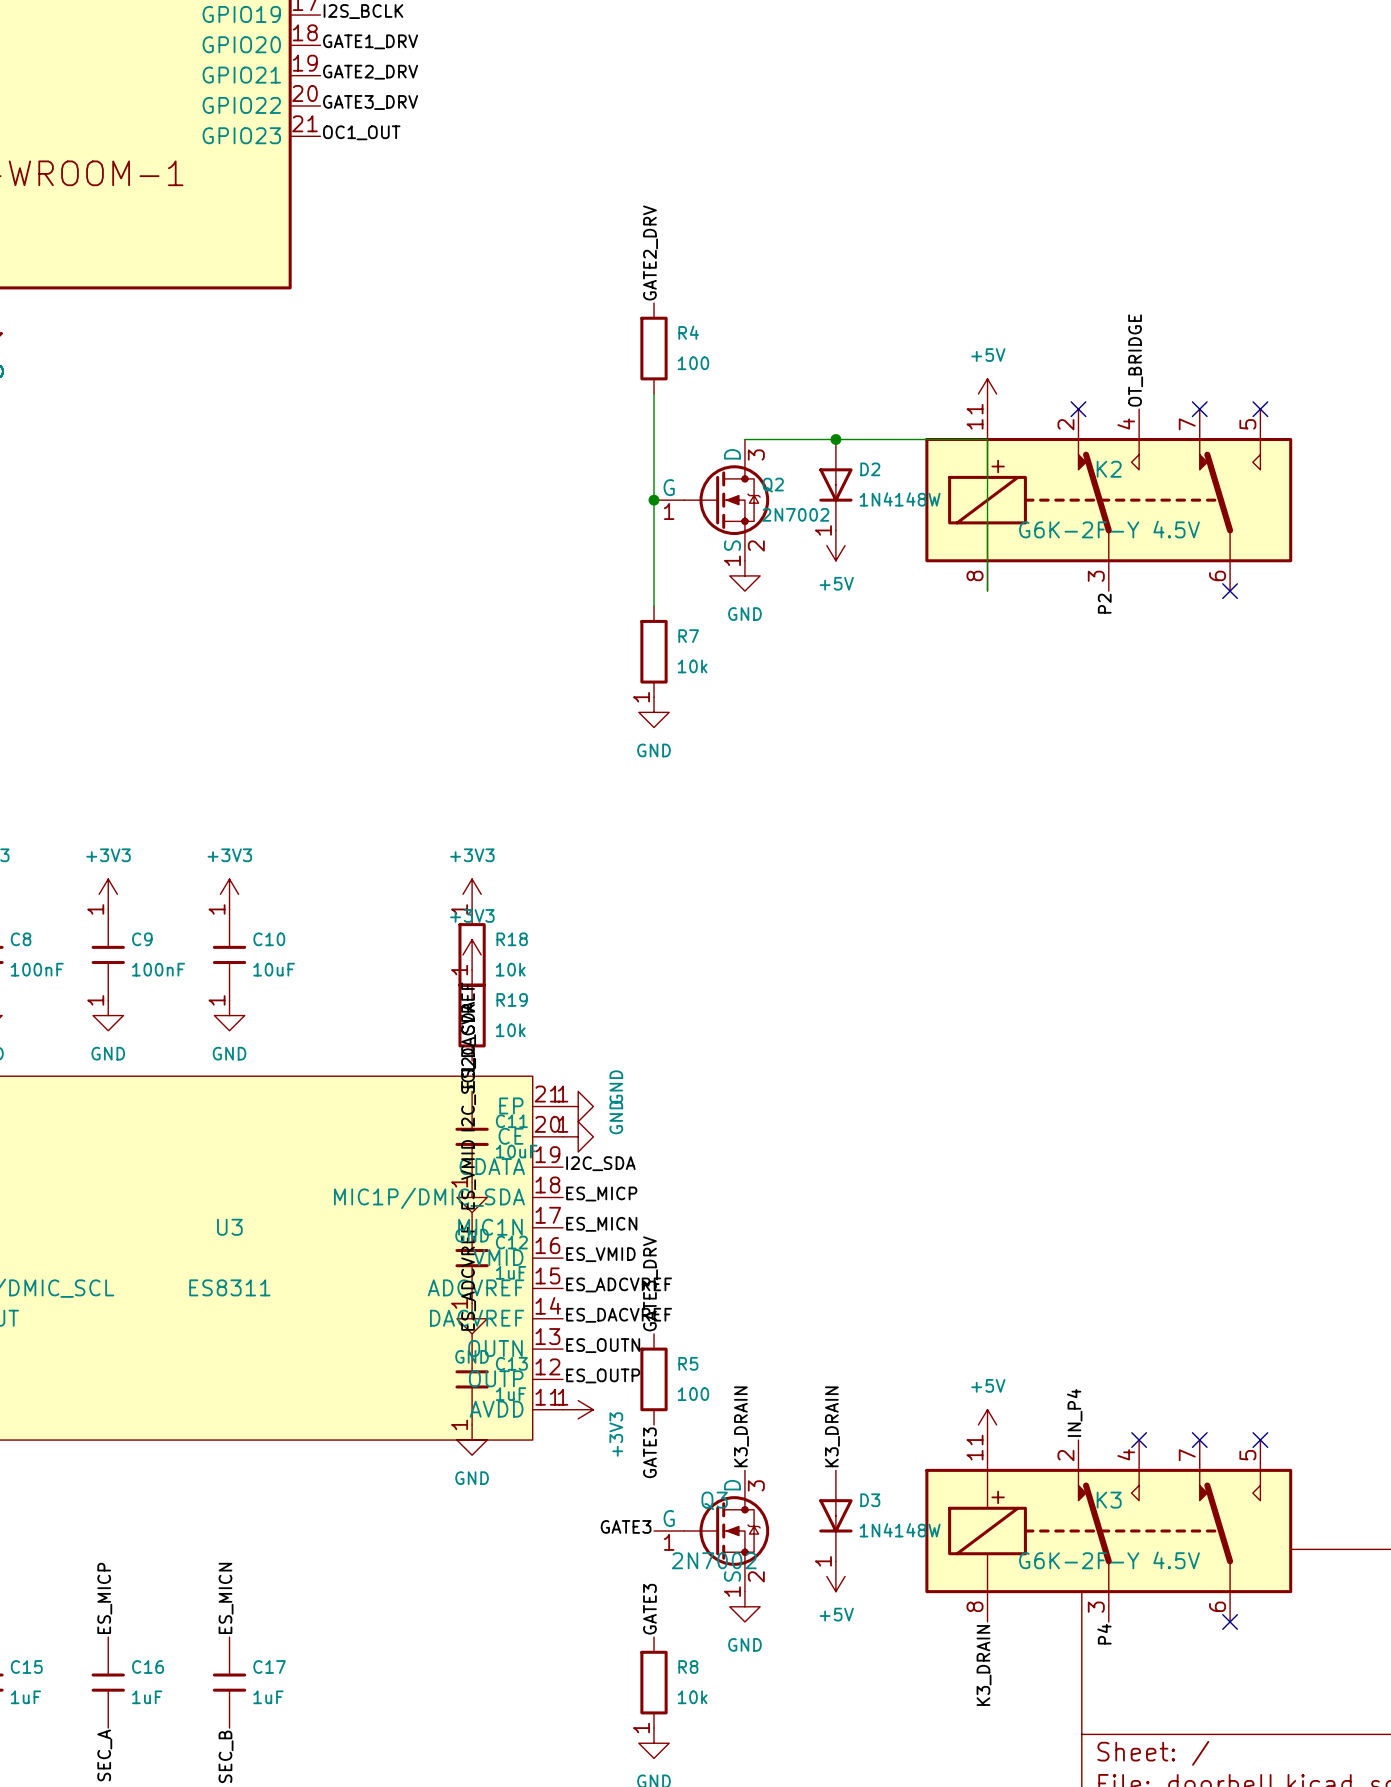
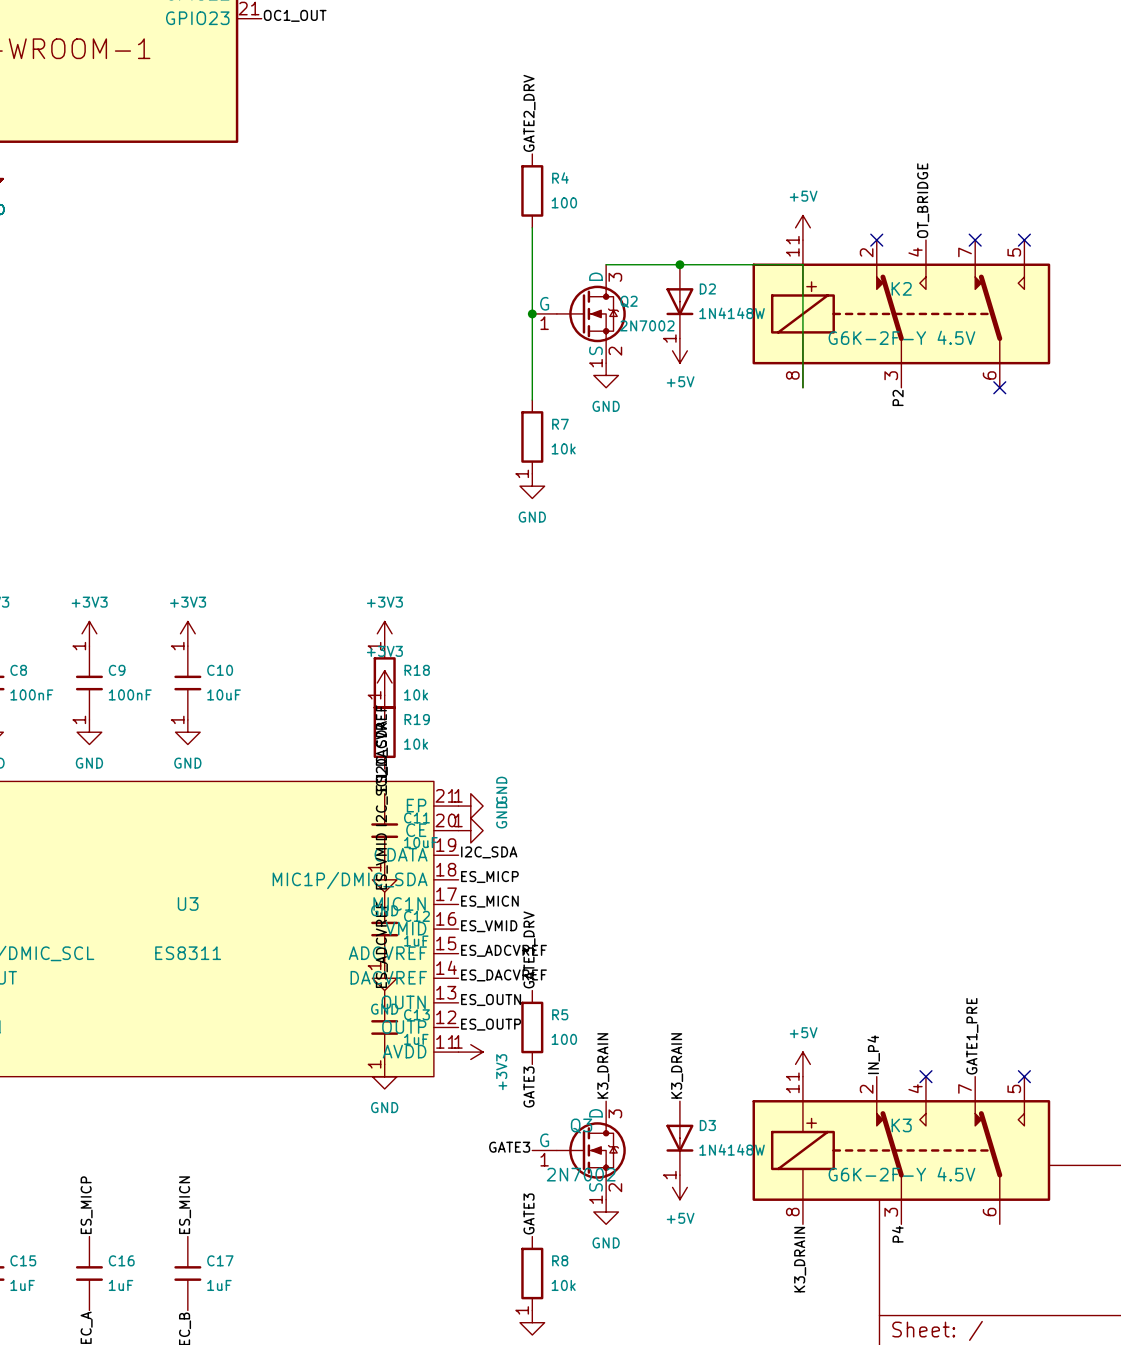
label: none -> GATE1_PRE (972, 1036)
no-connect mark: (1199, 1440) -> none
no-connect mark: (1230, 1621) -> none

